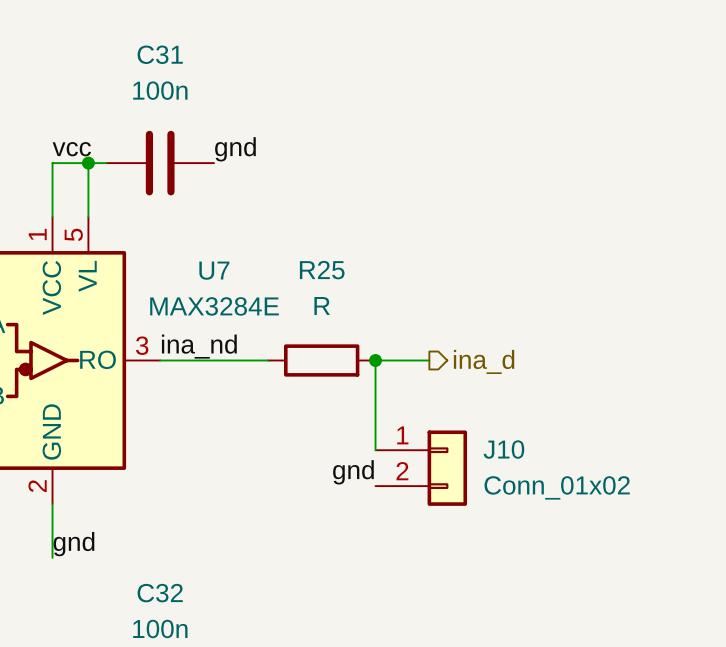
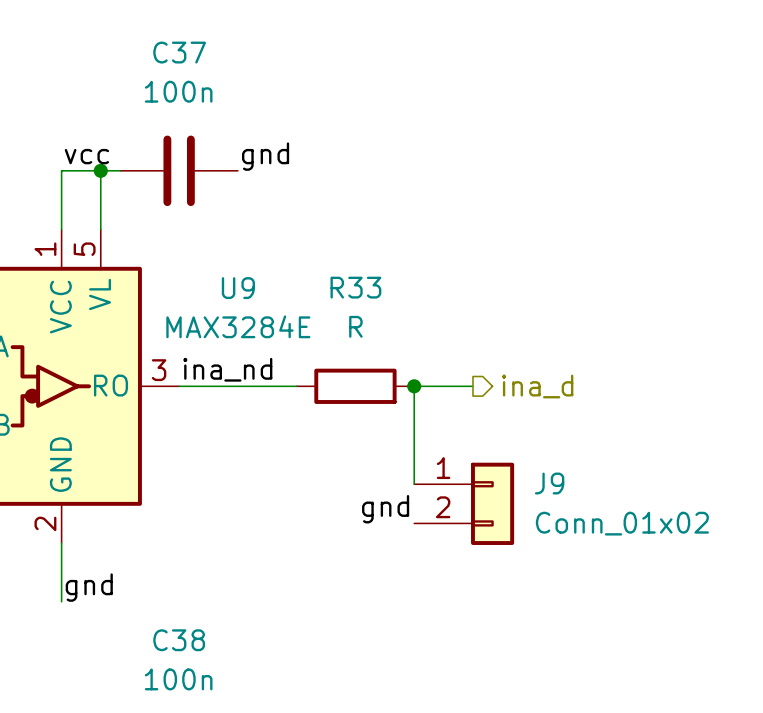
C31 name: C31 (160, 54) -> C37 (179, 52)
U7 name: U7 (214, 270) -> U9 (238, 288)
R25 name: R25 (322, 270) -> R33 (355, 287)
J10 name: J10 (503, 449) -> J9 (549, 483)
C32 name: C32 (160, 593) -> C38 (179, 640)

